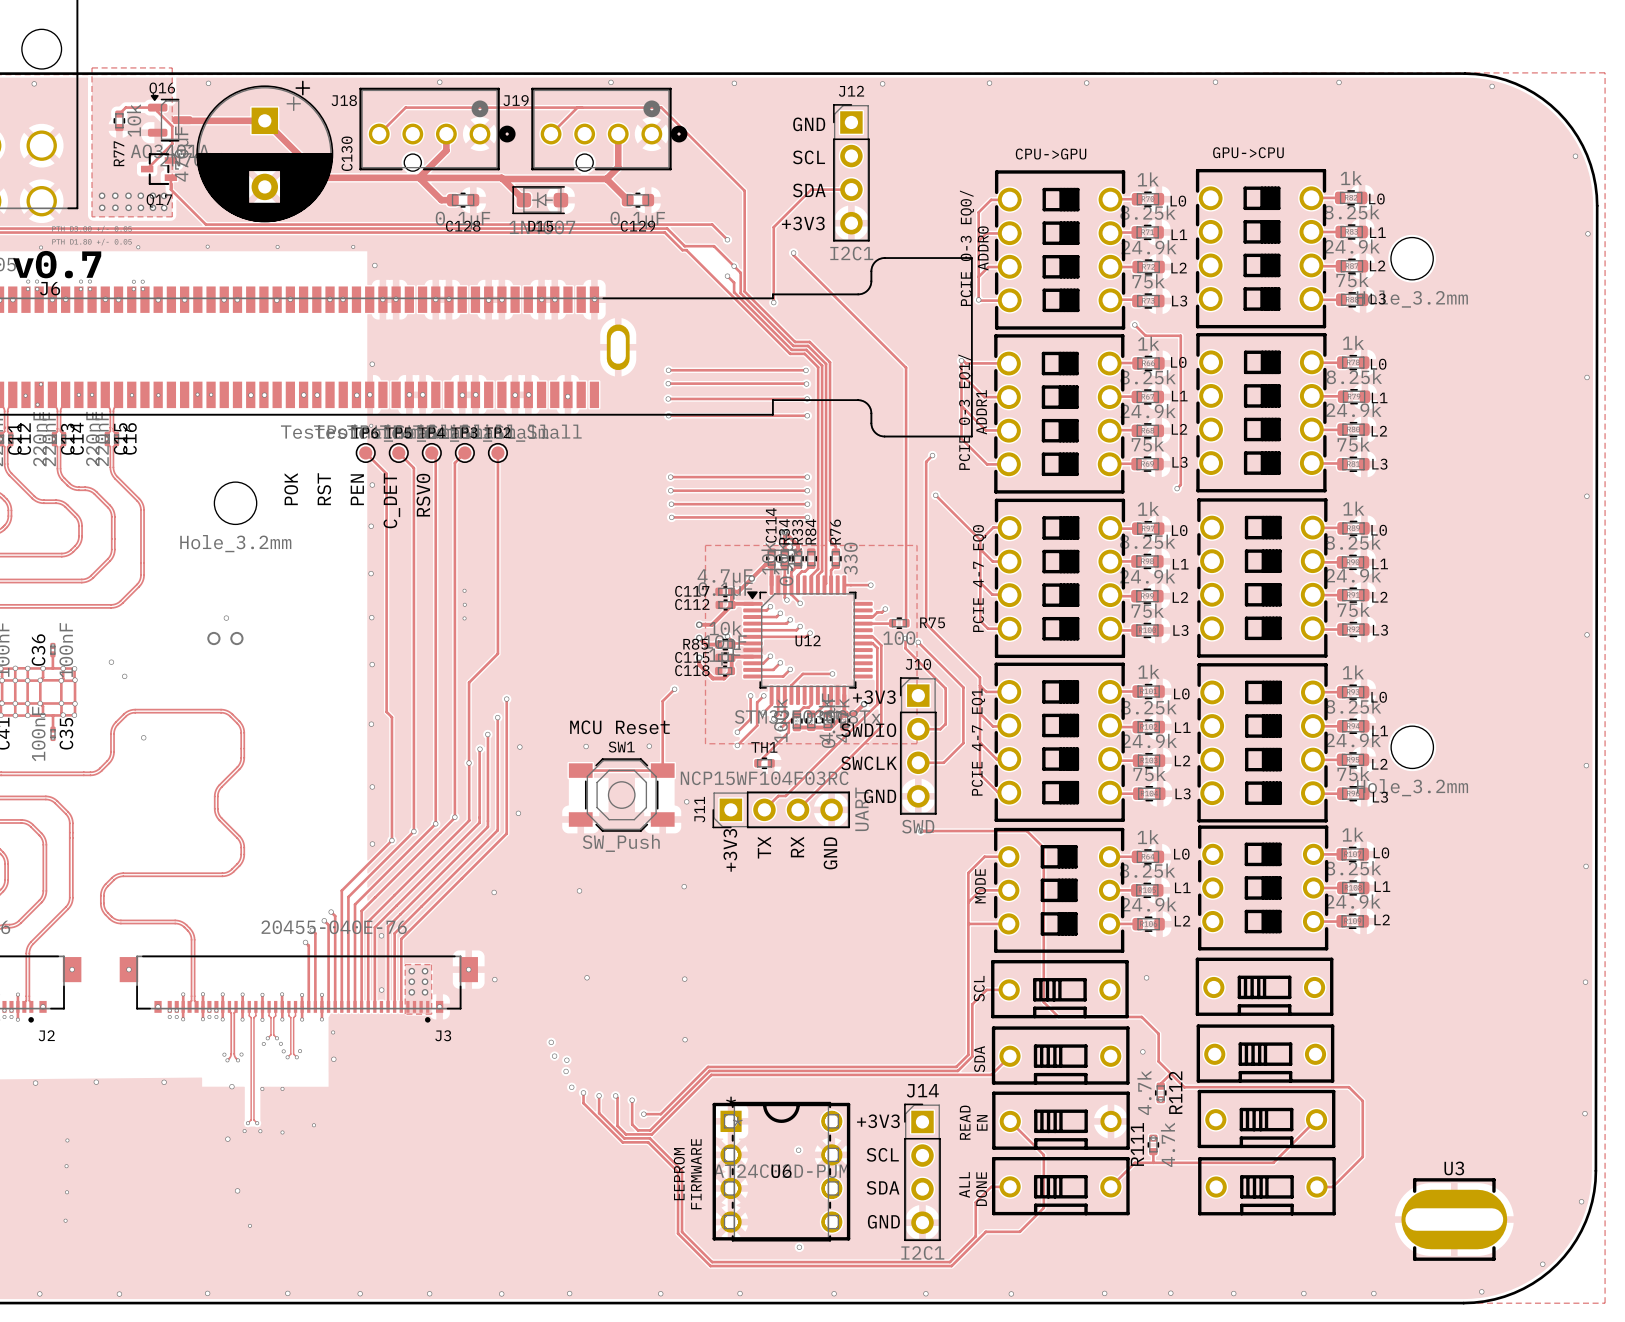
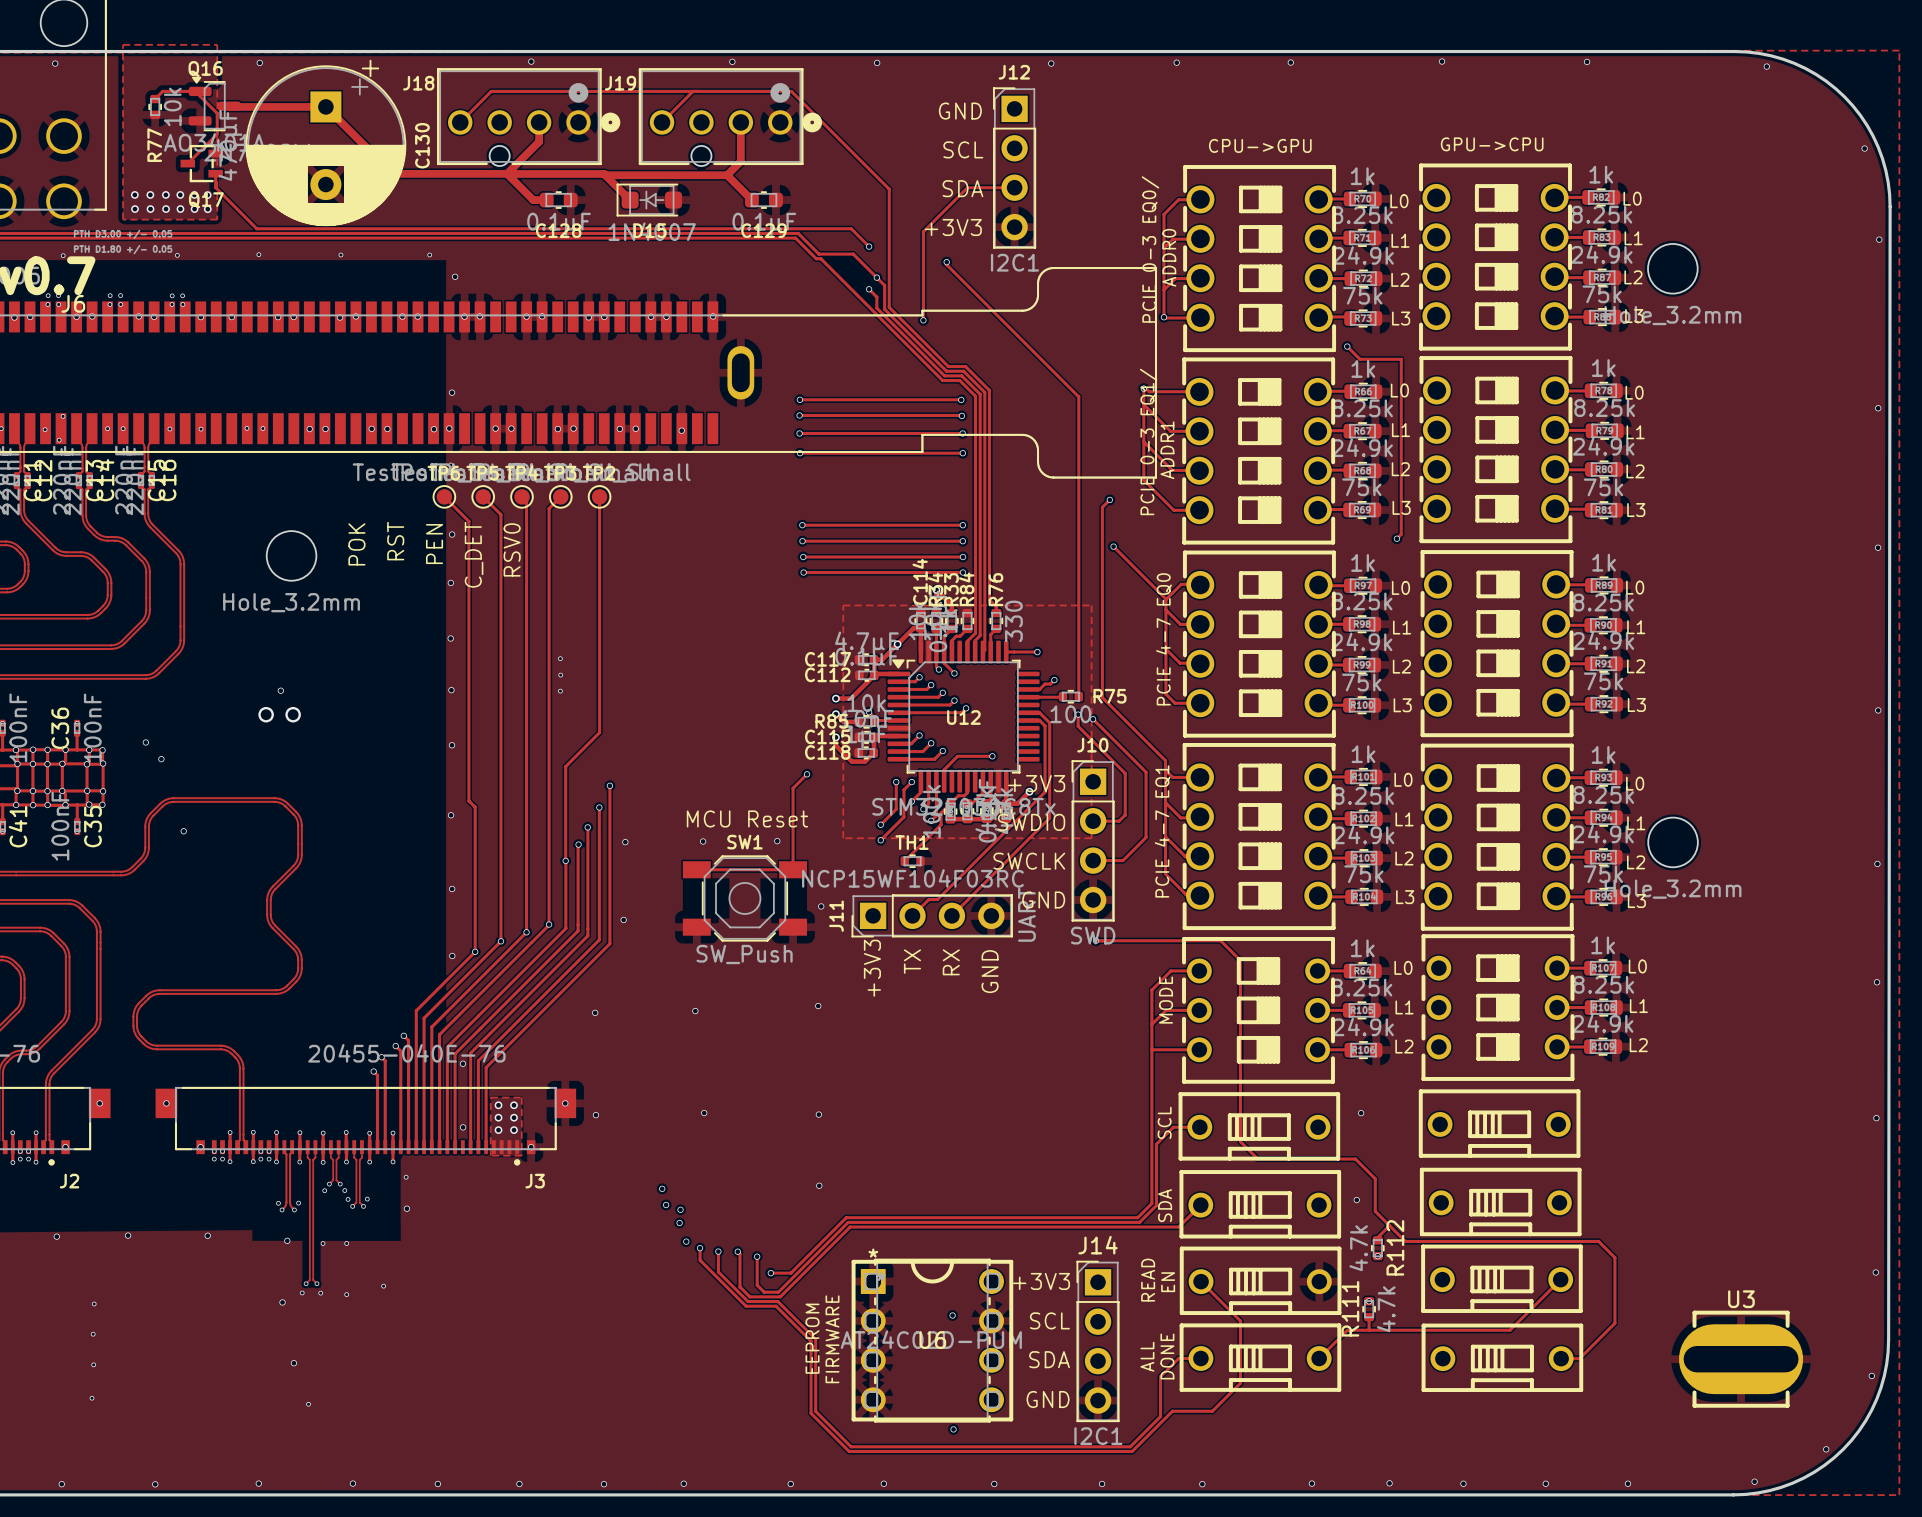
U3 position: (1454, 1219) -> (1741, 1359)

